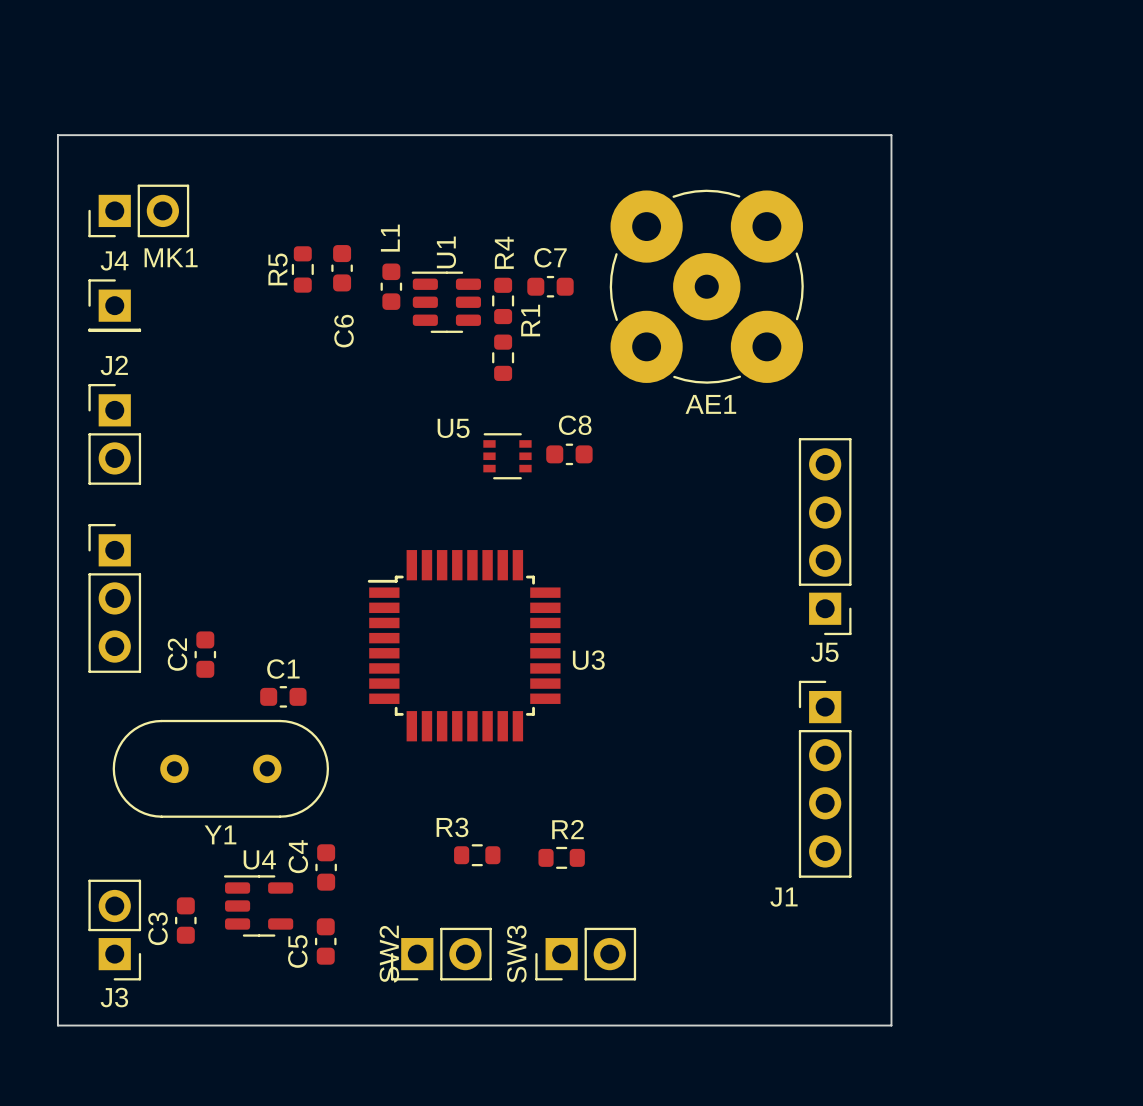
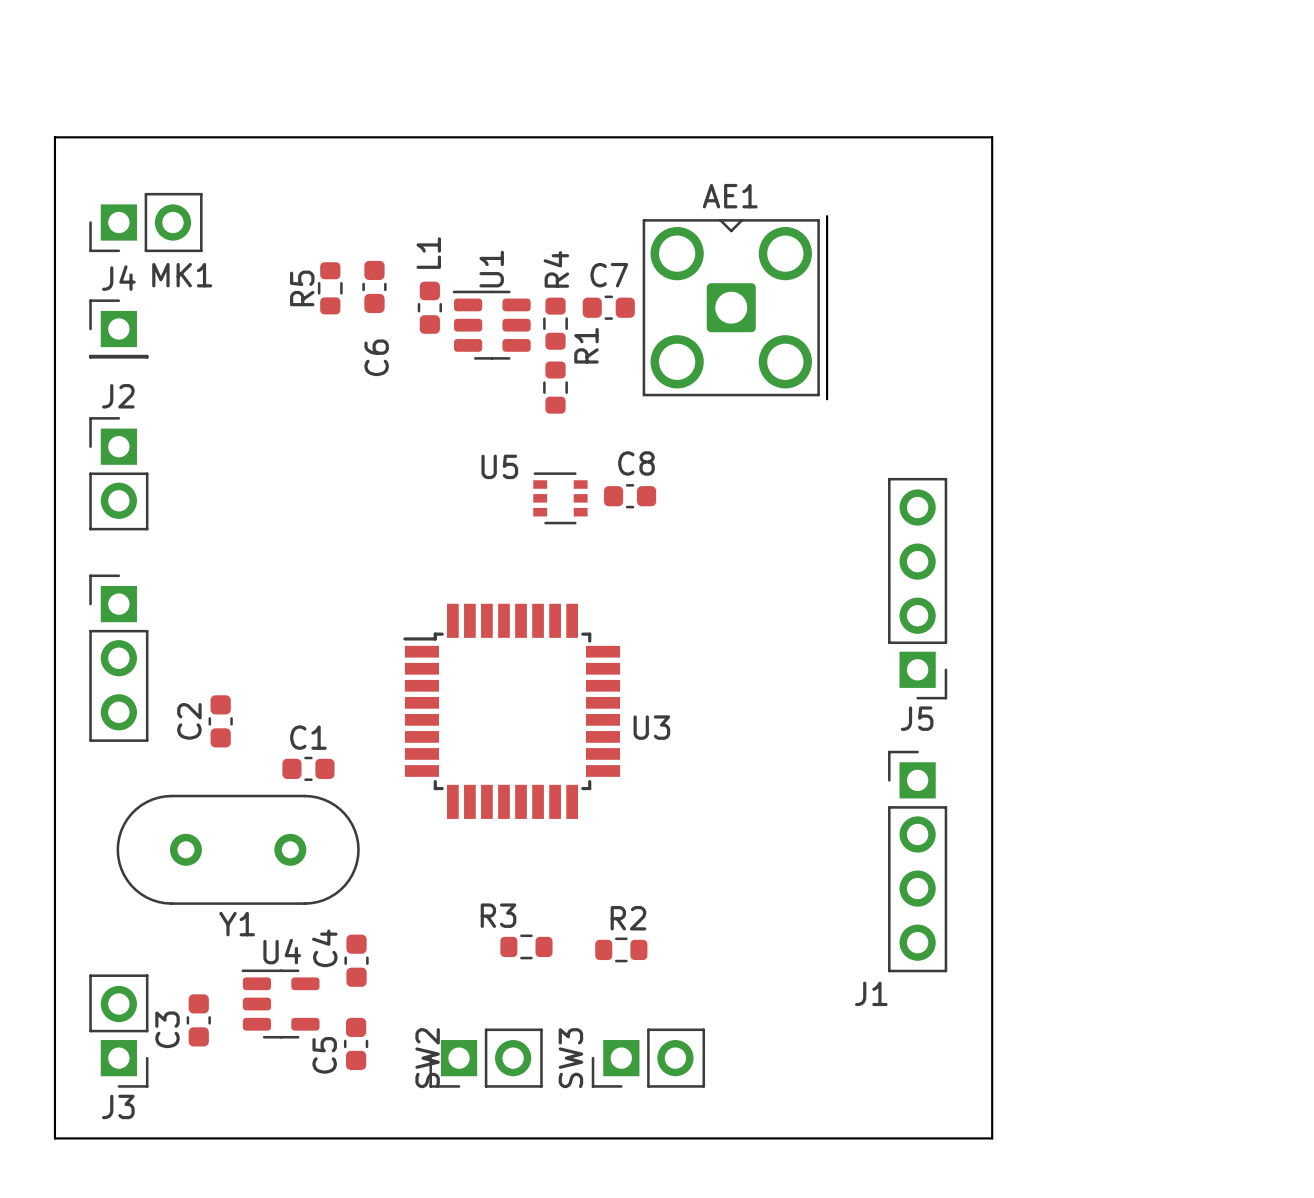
AE1 footprint: [609, 189, 804, 384] -> [642, 215, 829, 401]
AE1 name position: AE1 (710, 404) -> AE1 (730, 196)

